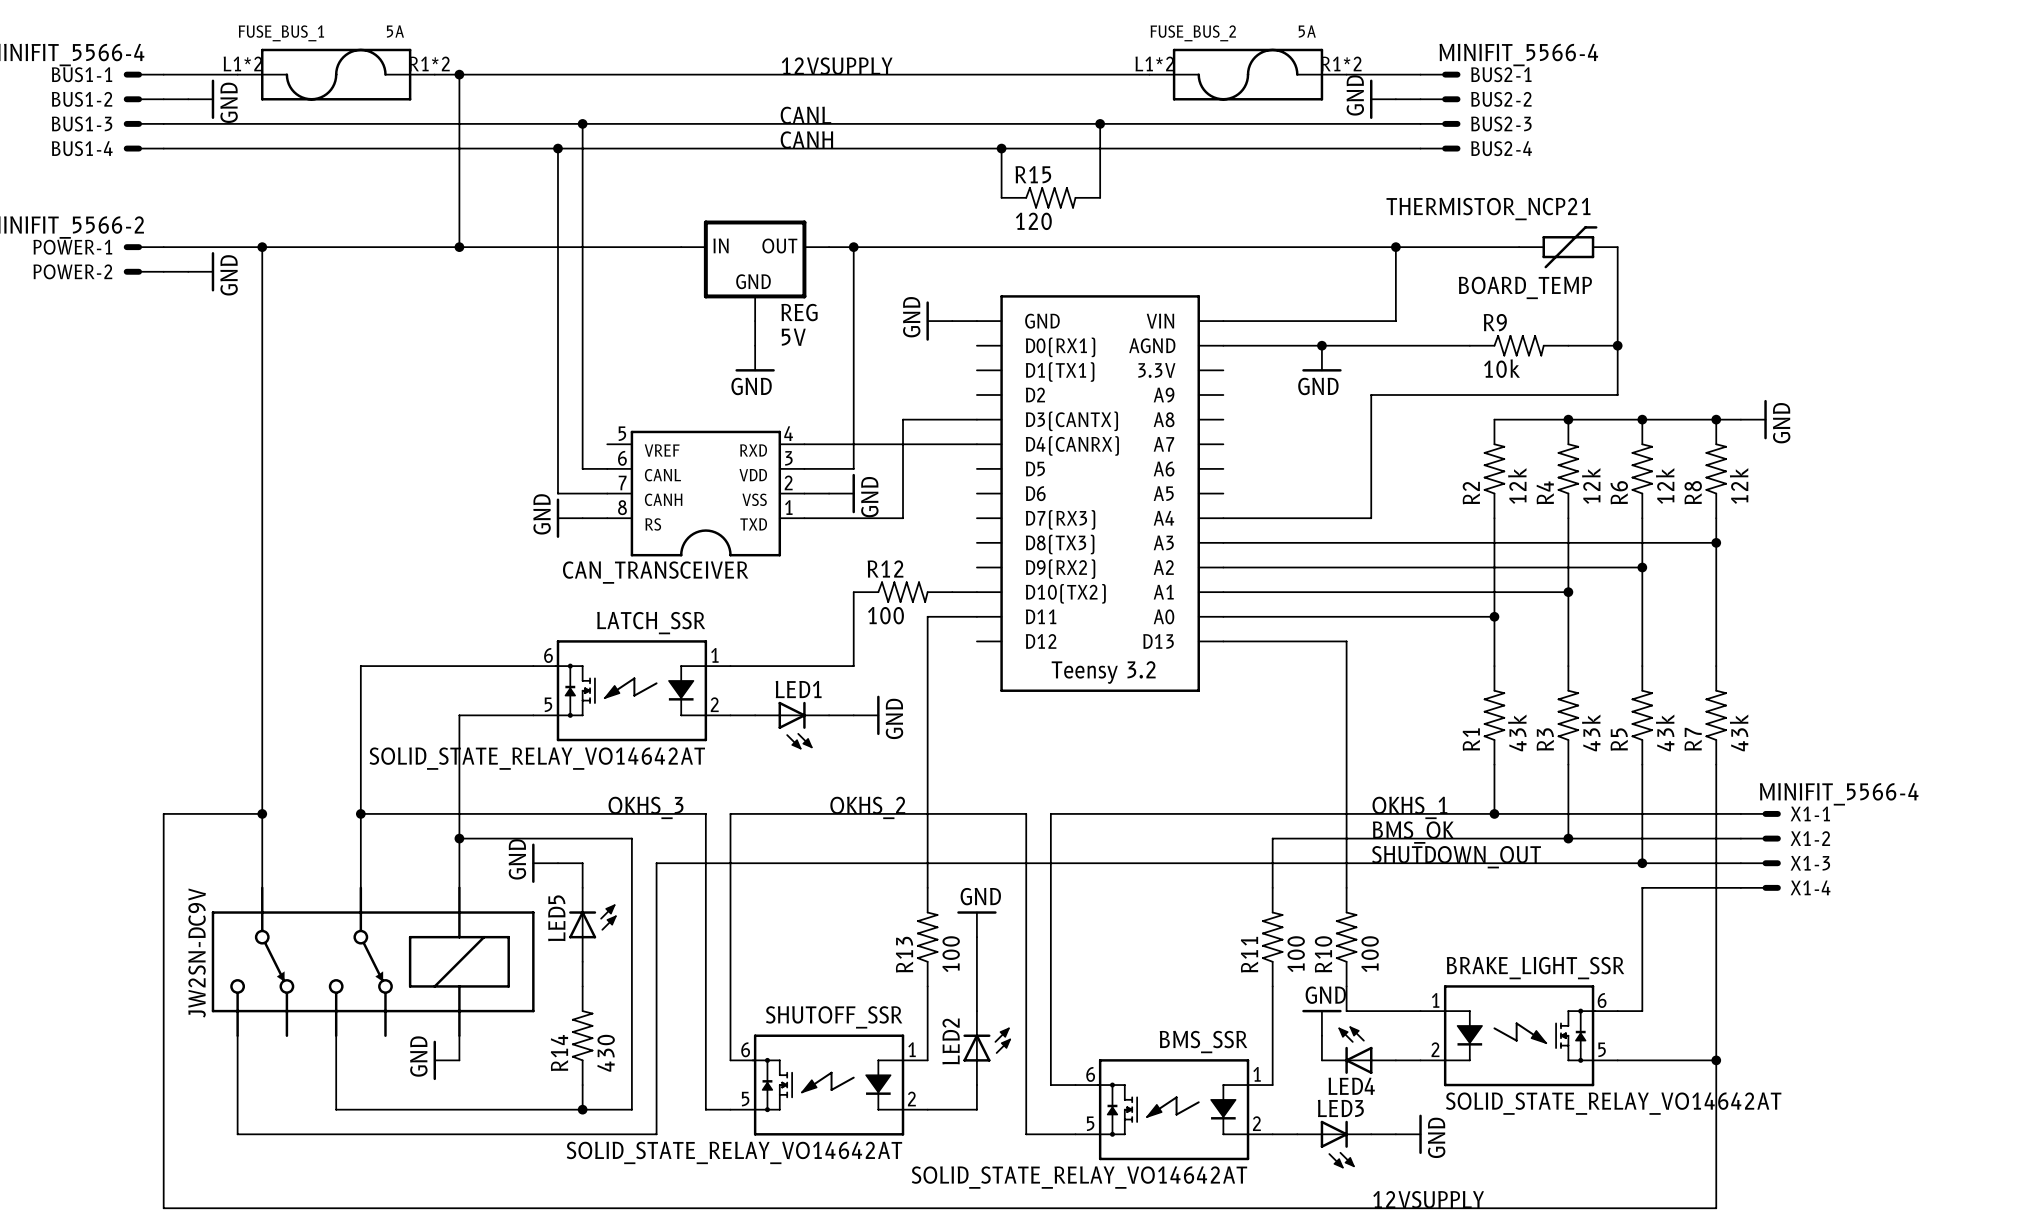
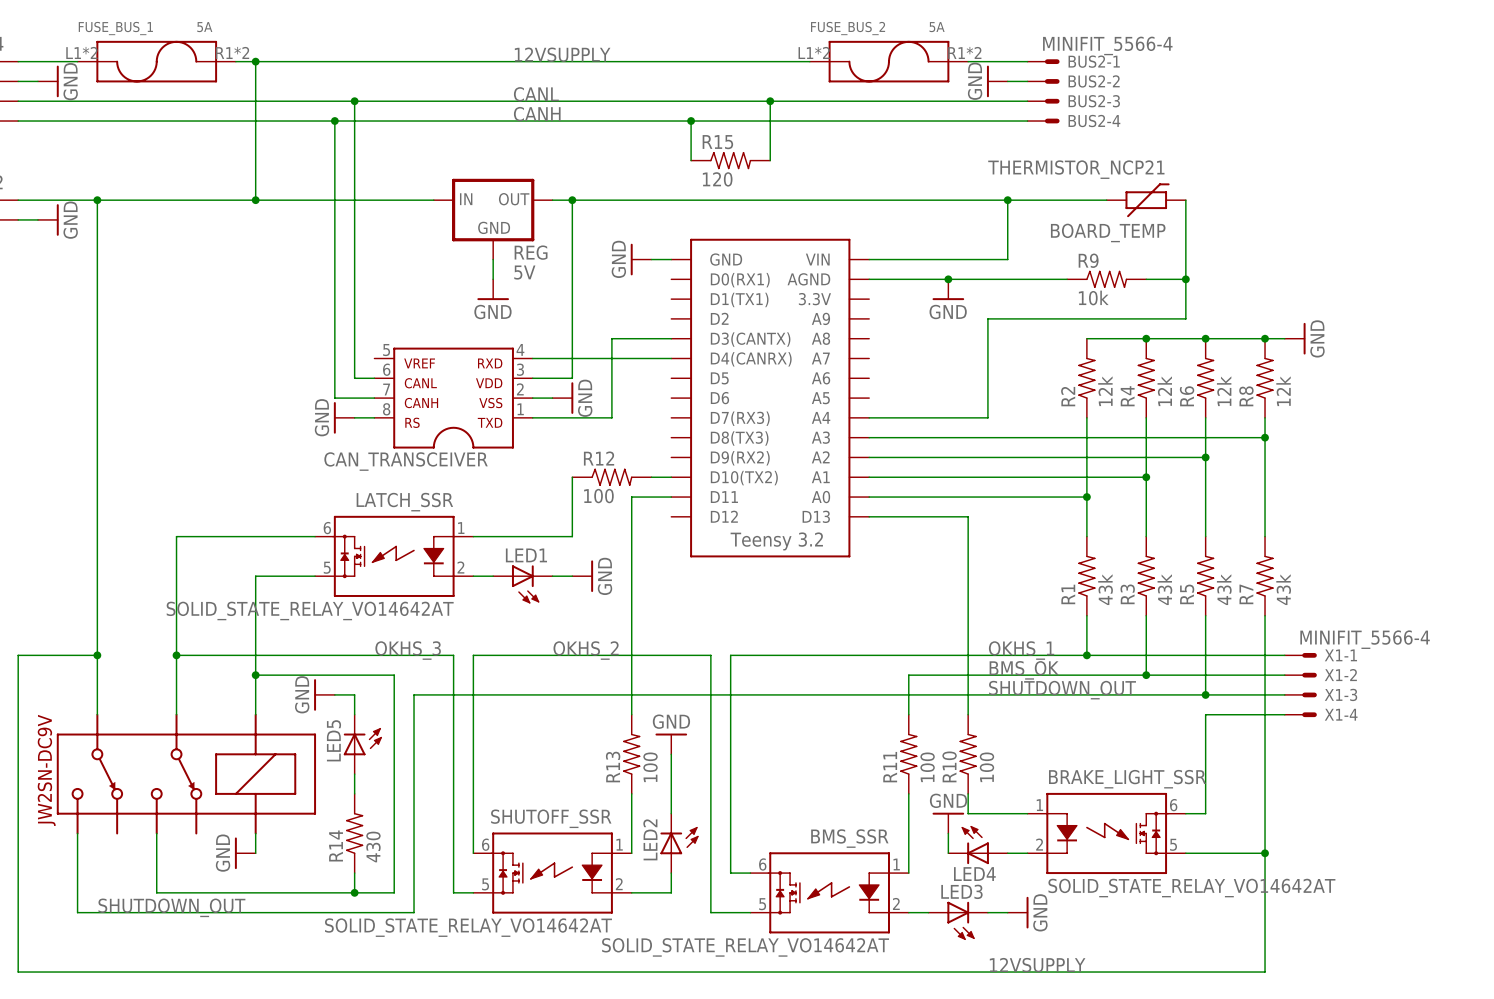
label: none -> SHUTDOWN_OUT (171, 907)

